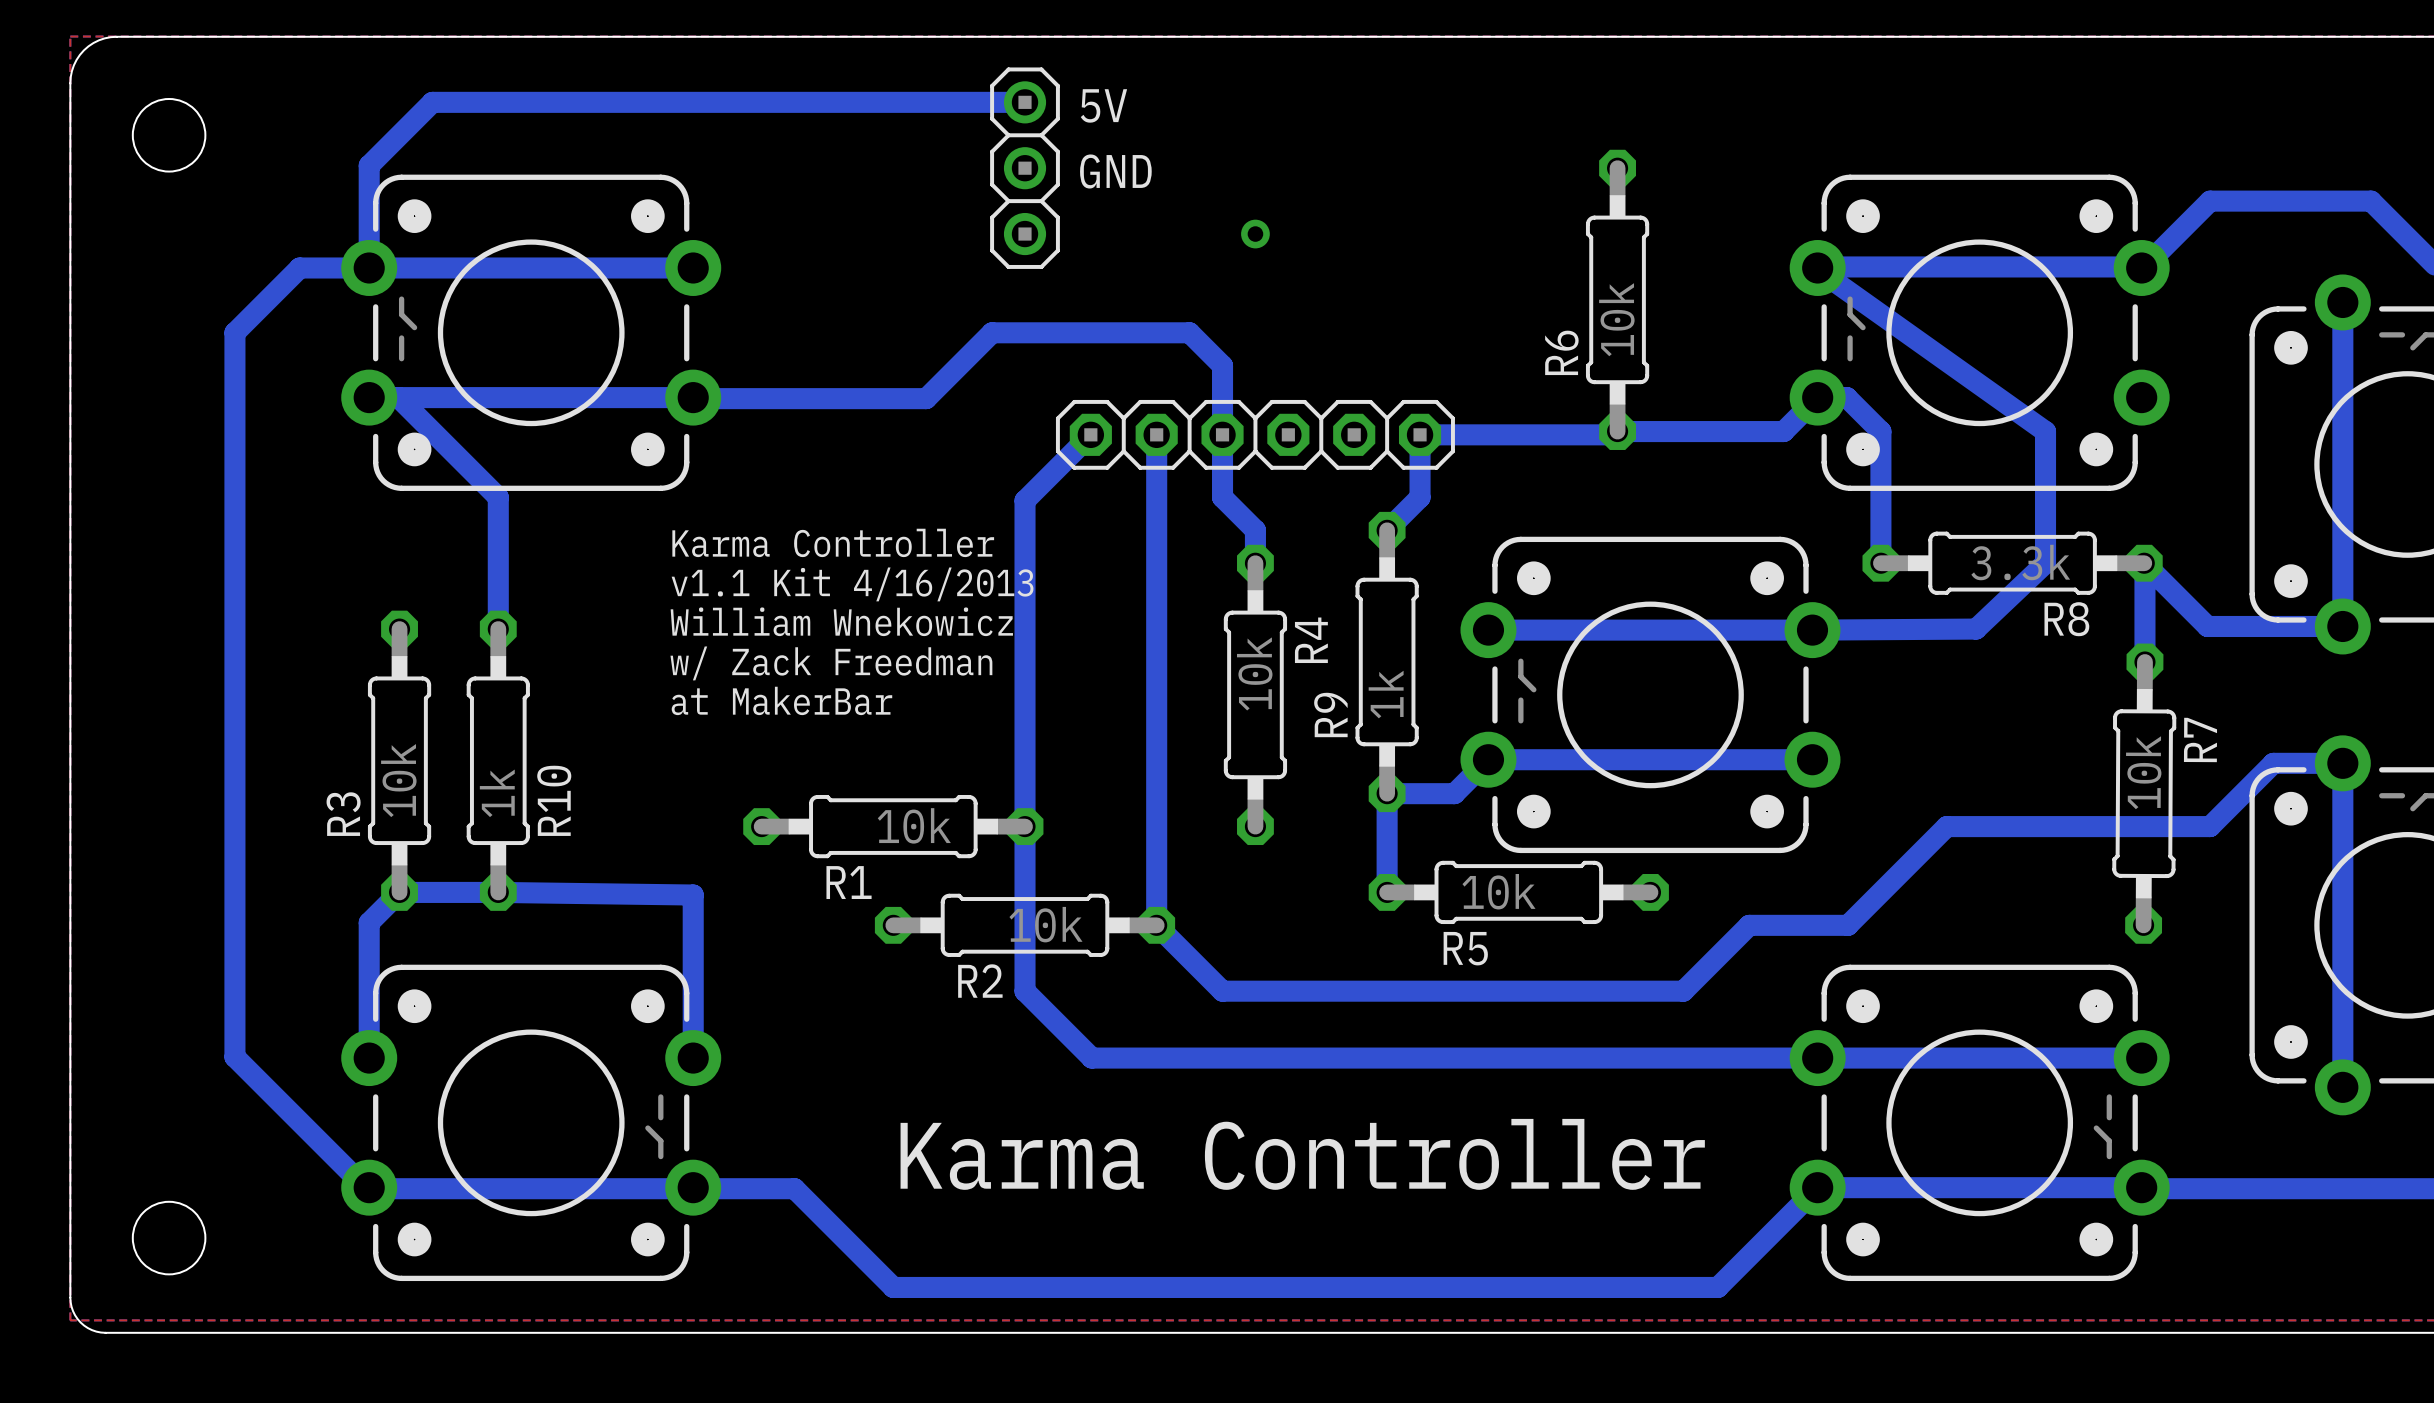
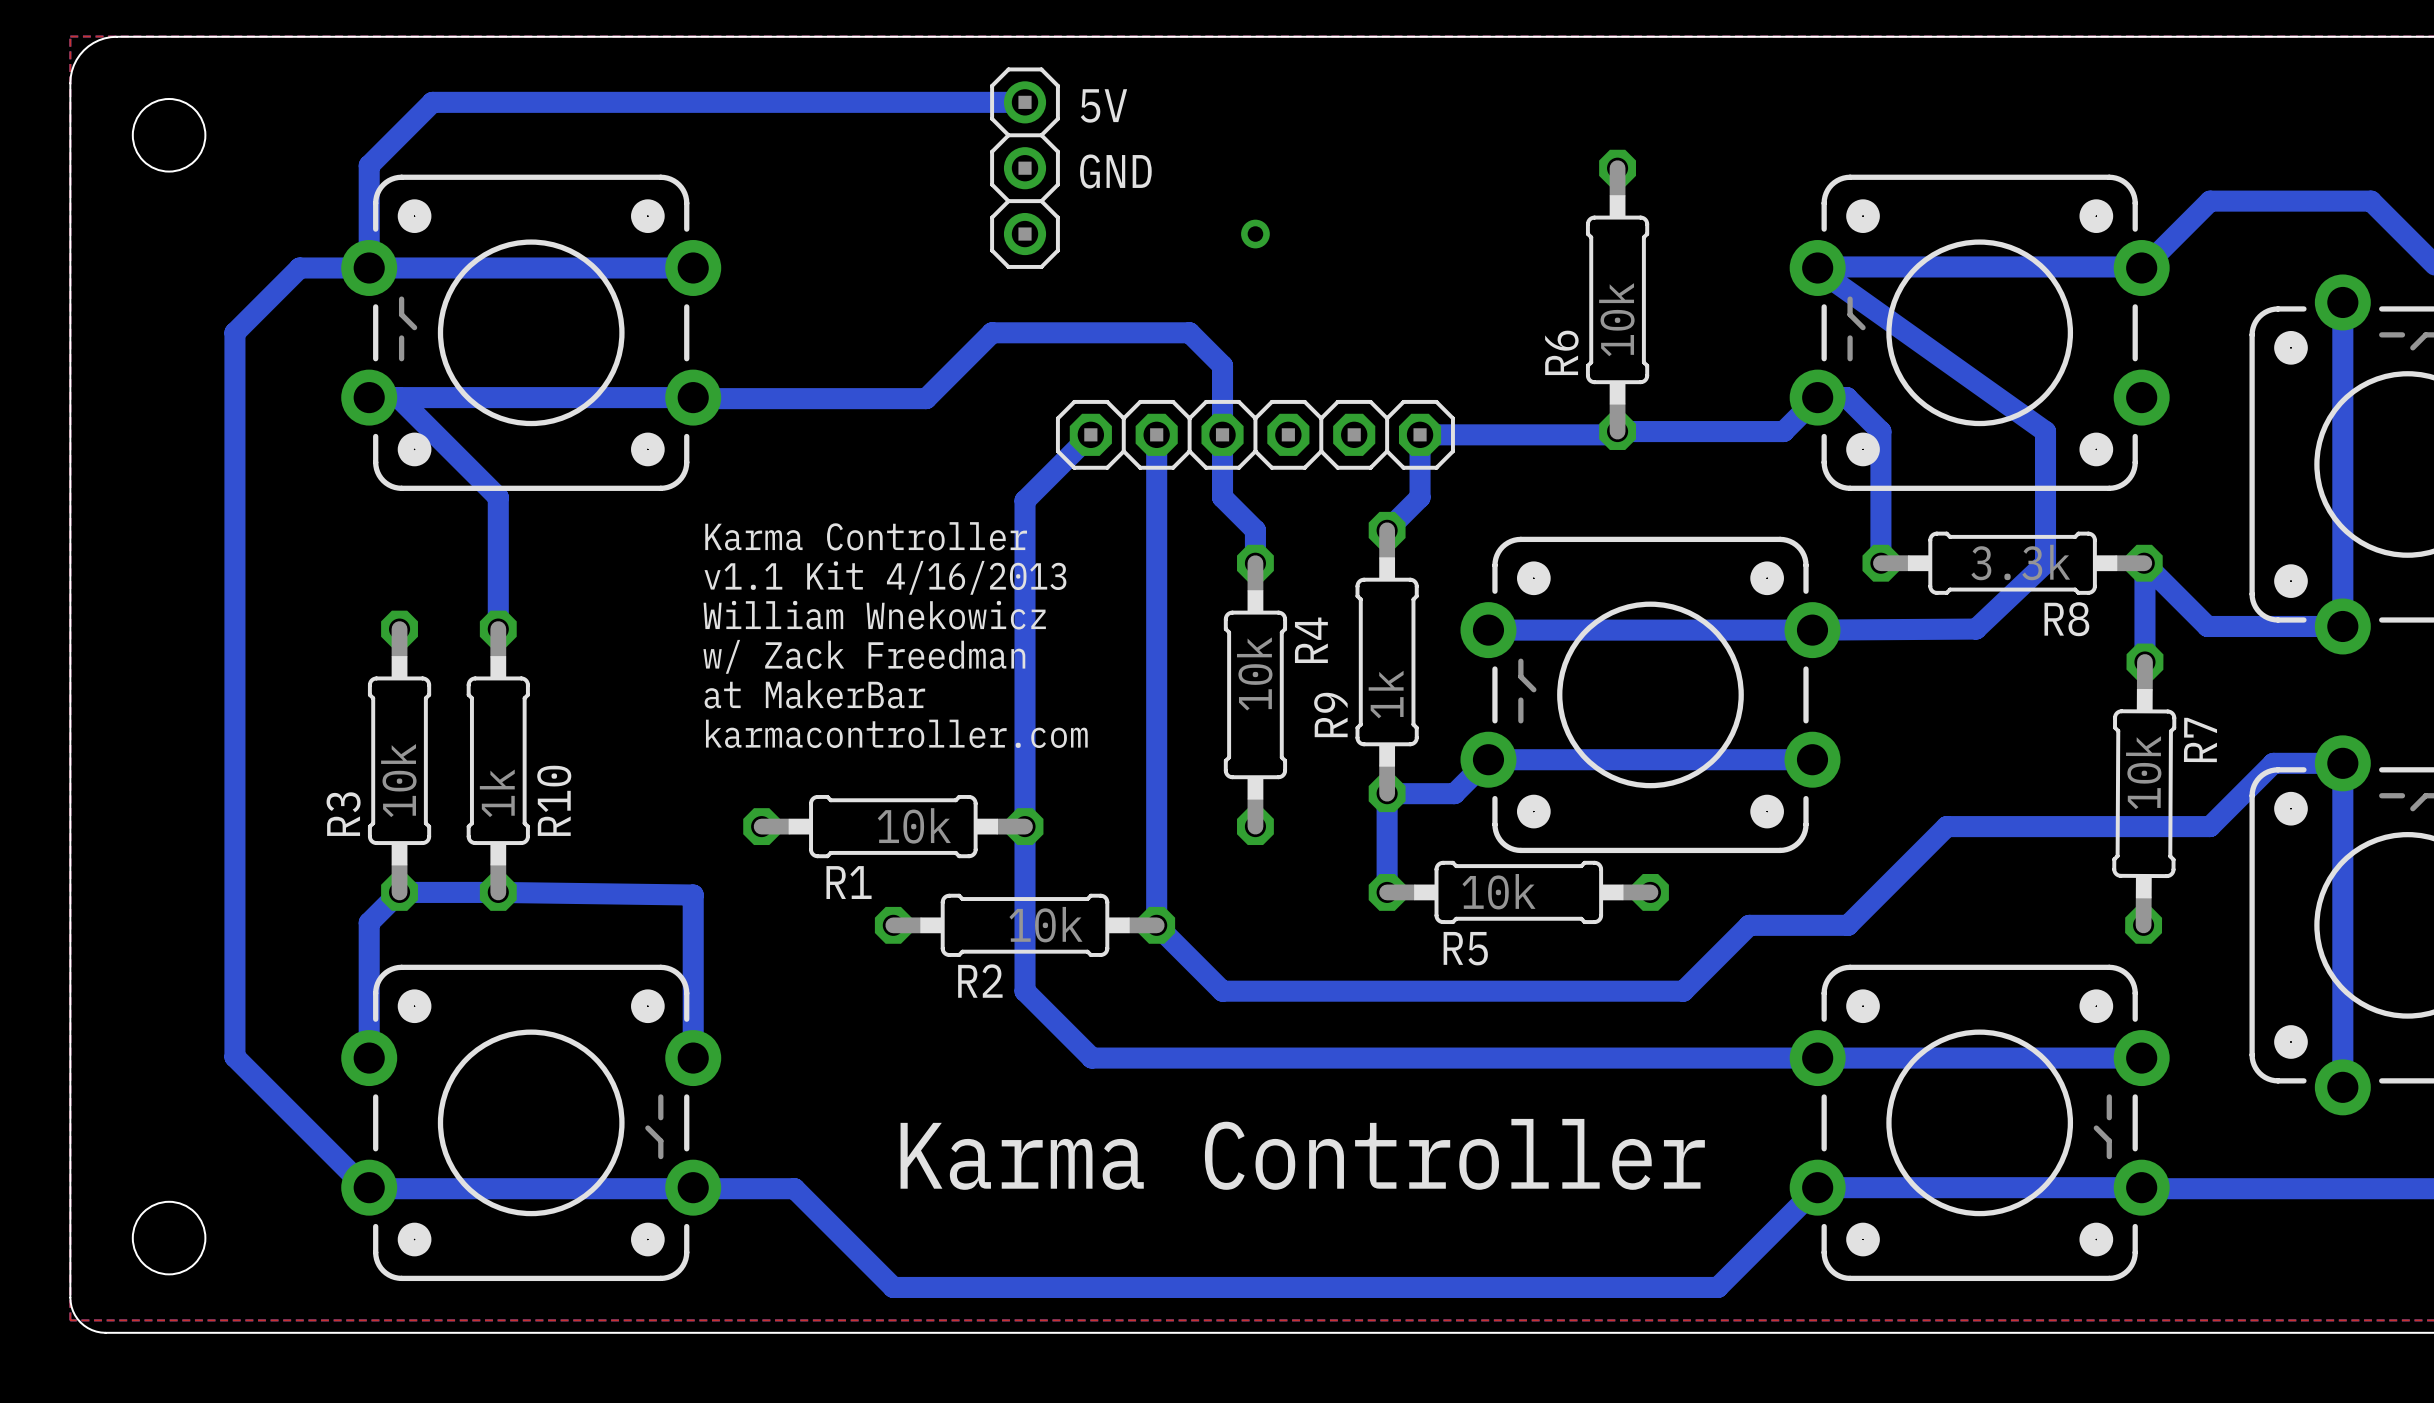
text position: Karma Controller (833, 542) -> Karma Controller (866, 536)
text position: v1.1 Kit 4/16/2013 (852, 584) -> v1.1 Kit 4/16/2013 (885, 577)
text position: William Wnekowicz (841, 621) -> William Wnekowicz (874, 615)
text position: w/ Zack Freedman (831, 663) -> w/ Zack Freedman (864, 656)
text position: at MakerBar (781, 700) -> at MakerBar (814, 694)
text: none -> karmacontroller.com (896, 733)

